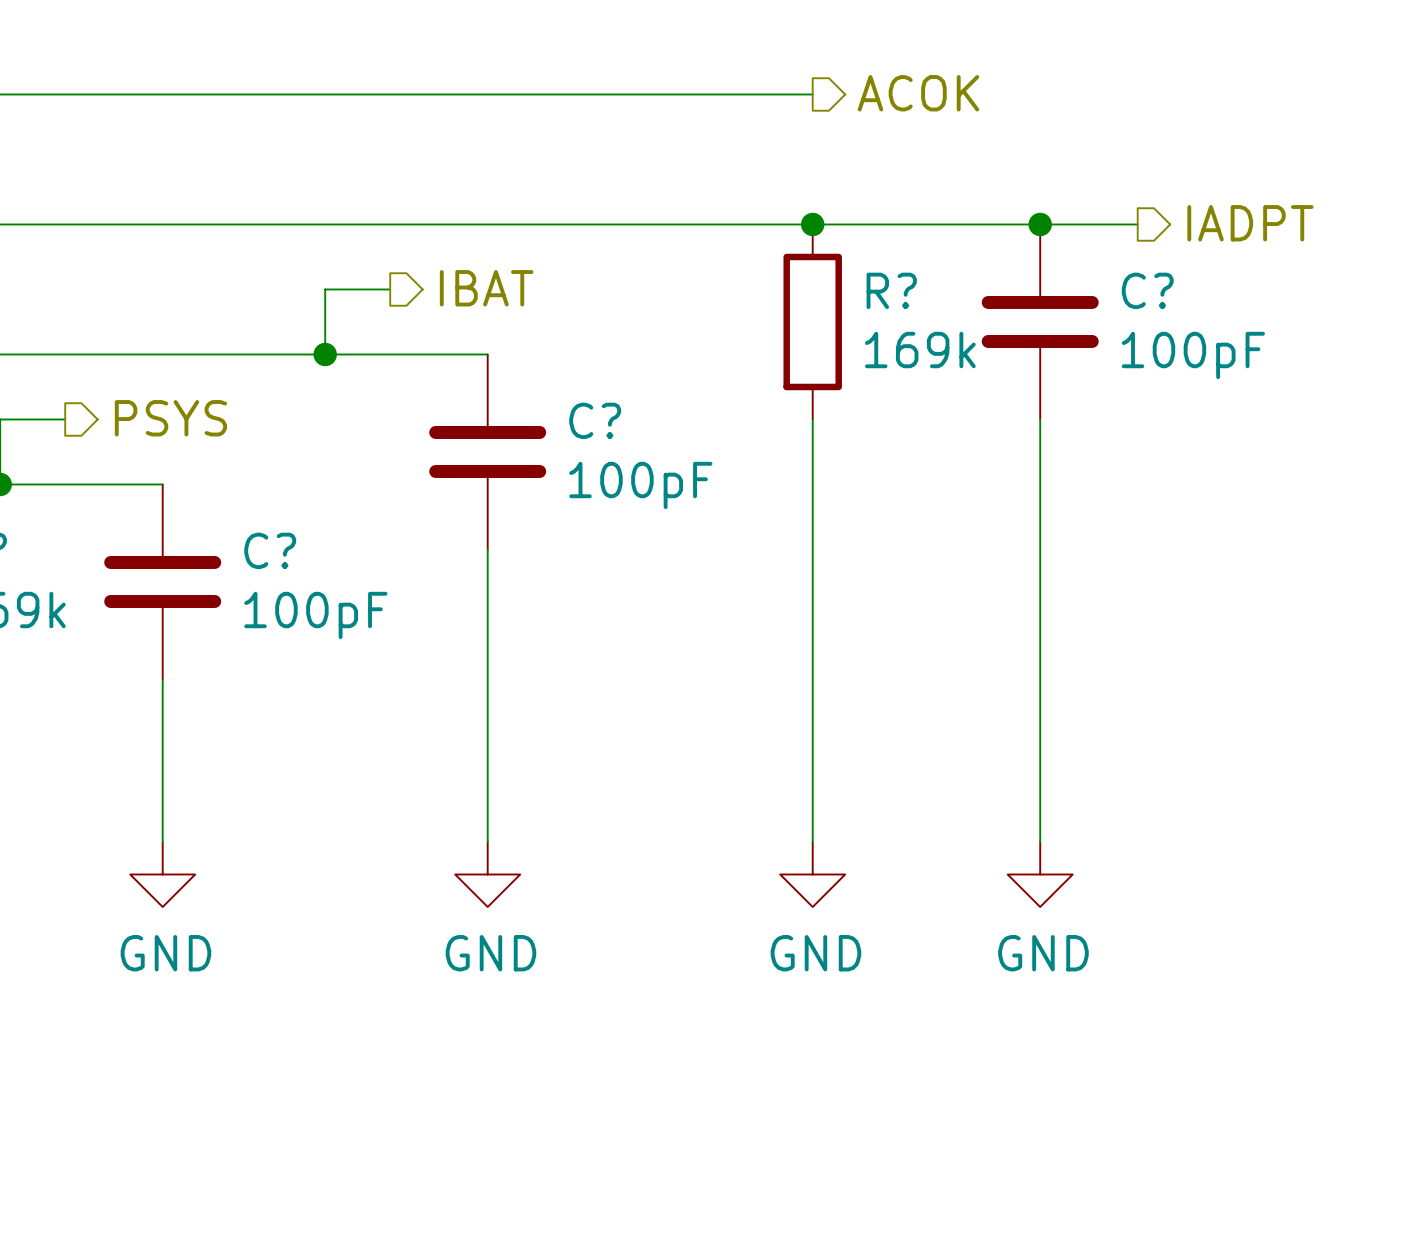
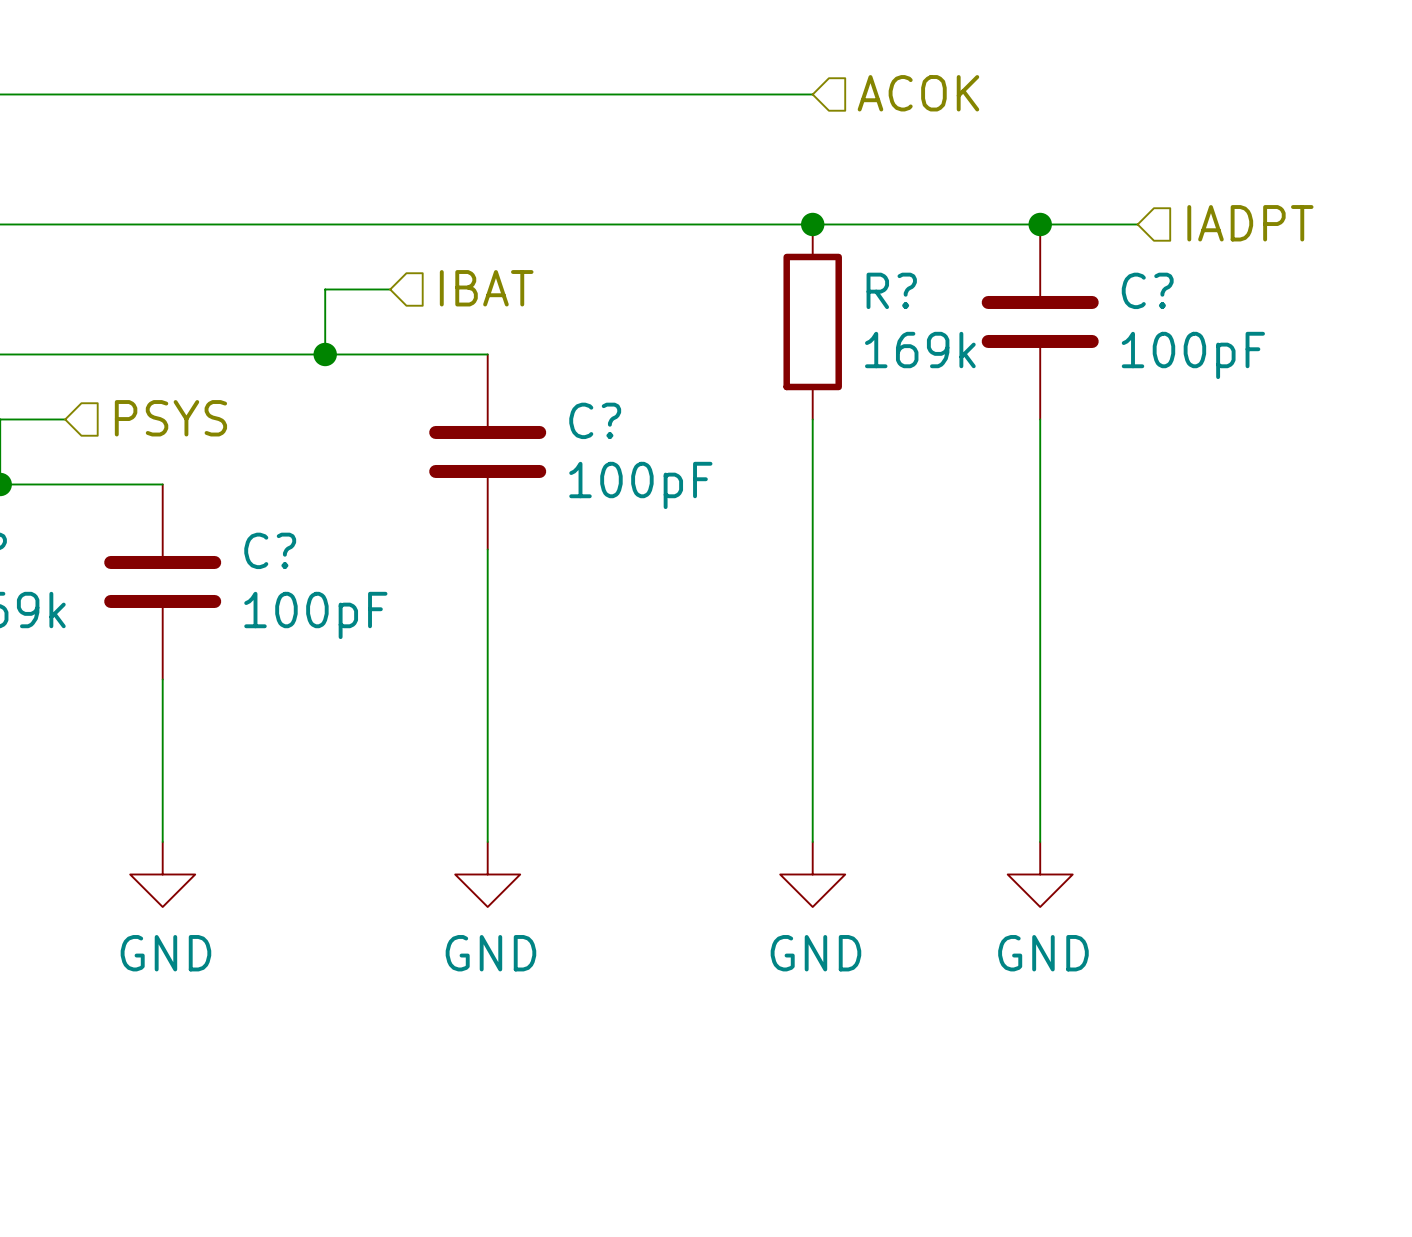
hierarchical label shape: output (918, 93) -> input (918, 93)
hierarchical label shape: output (1250, 223) -> input (1250, 223)
hierarchical label shape: output (486, 288) -> input (486, 288)
hierarchical label shape: output (170, 418) -> input (170, 418)

